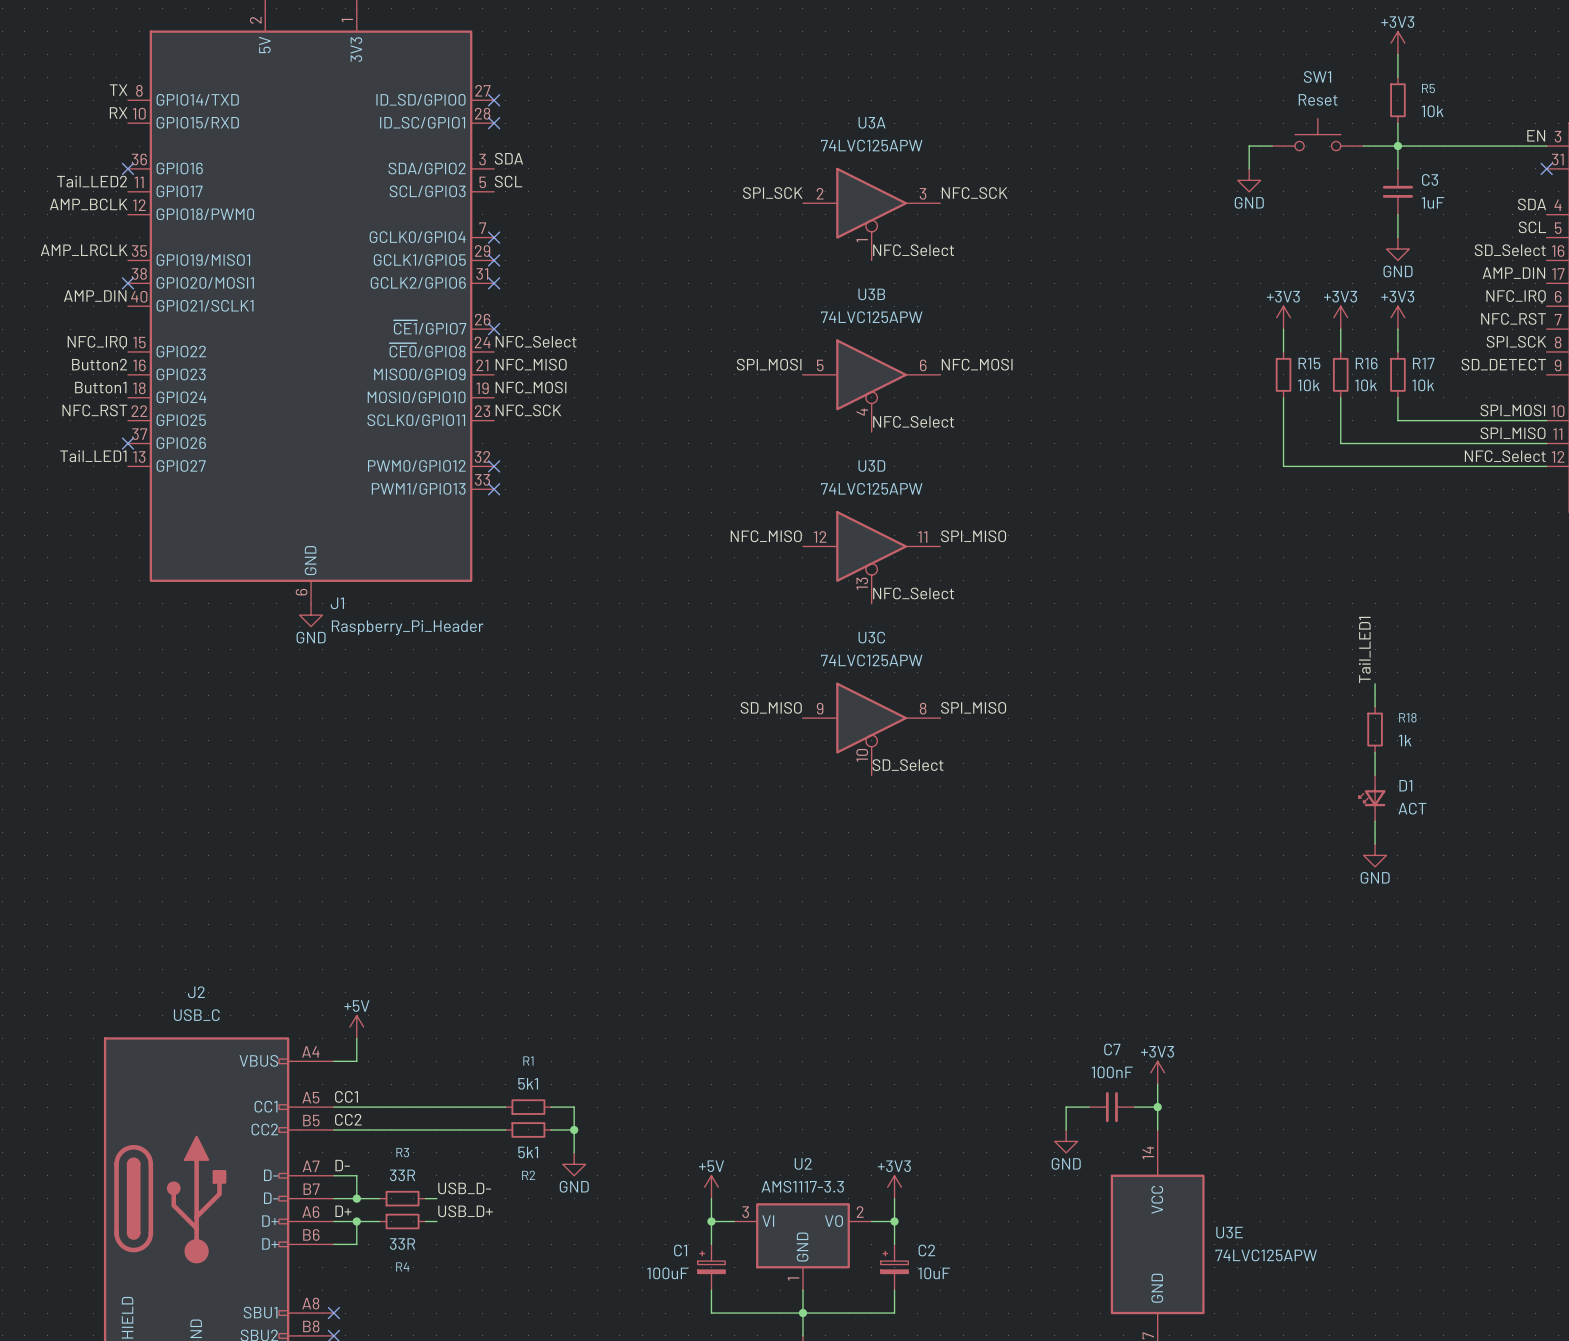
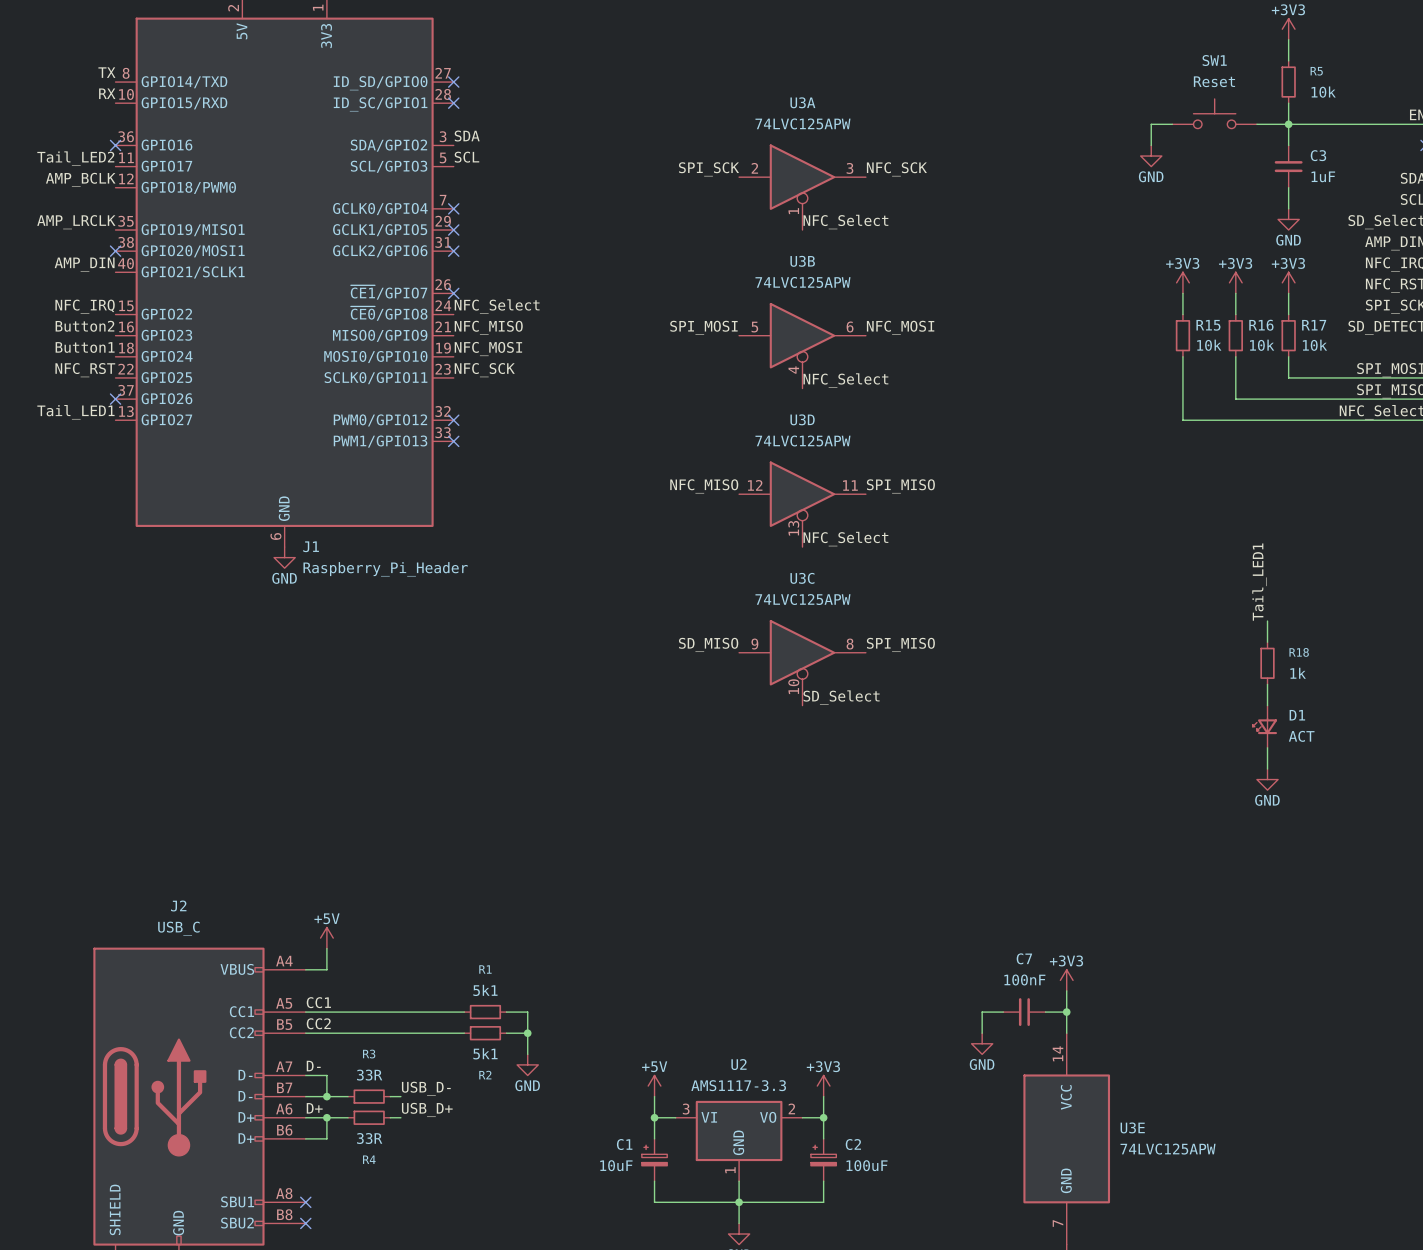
C1 value: 100uF (667, 1273) -> 10uF (616, 1165)
C2 value: 10uF (934, 1273) -> 100uF (867, 1165)

